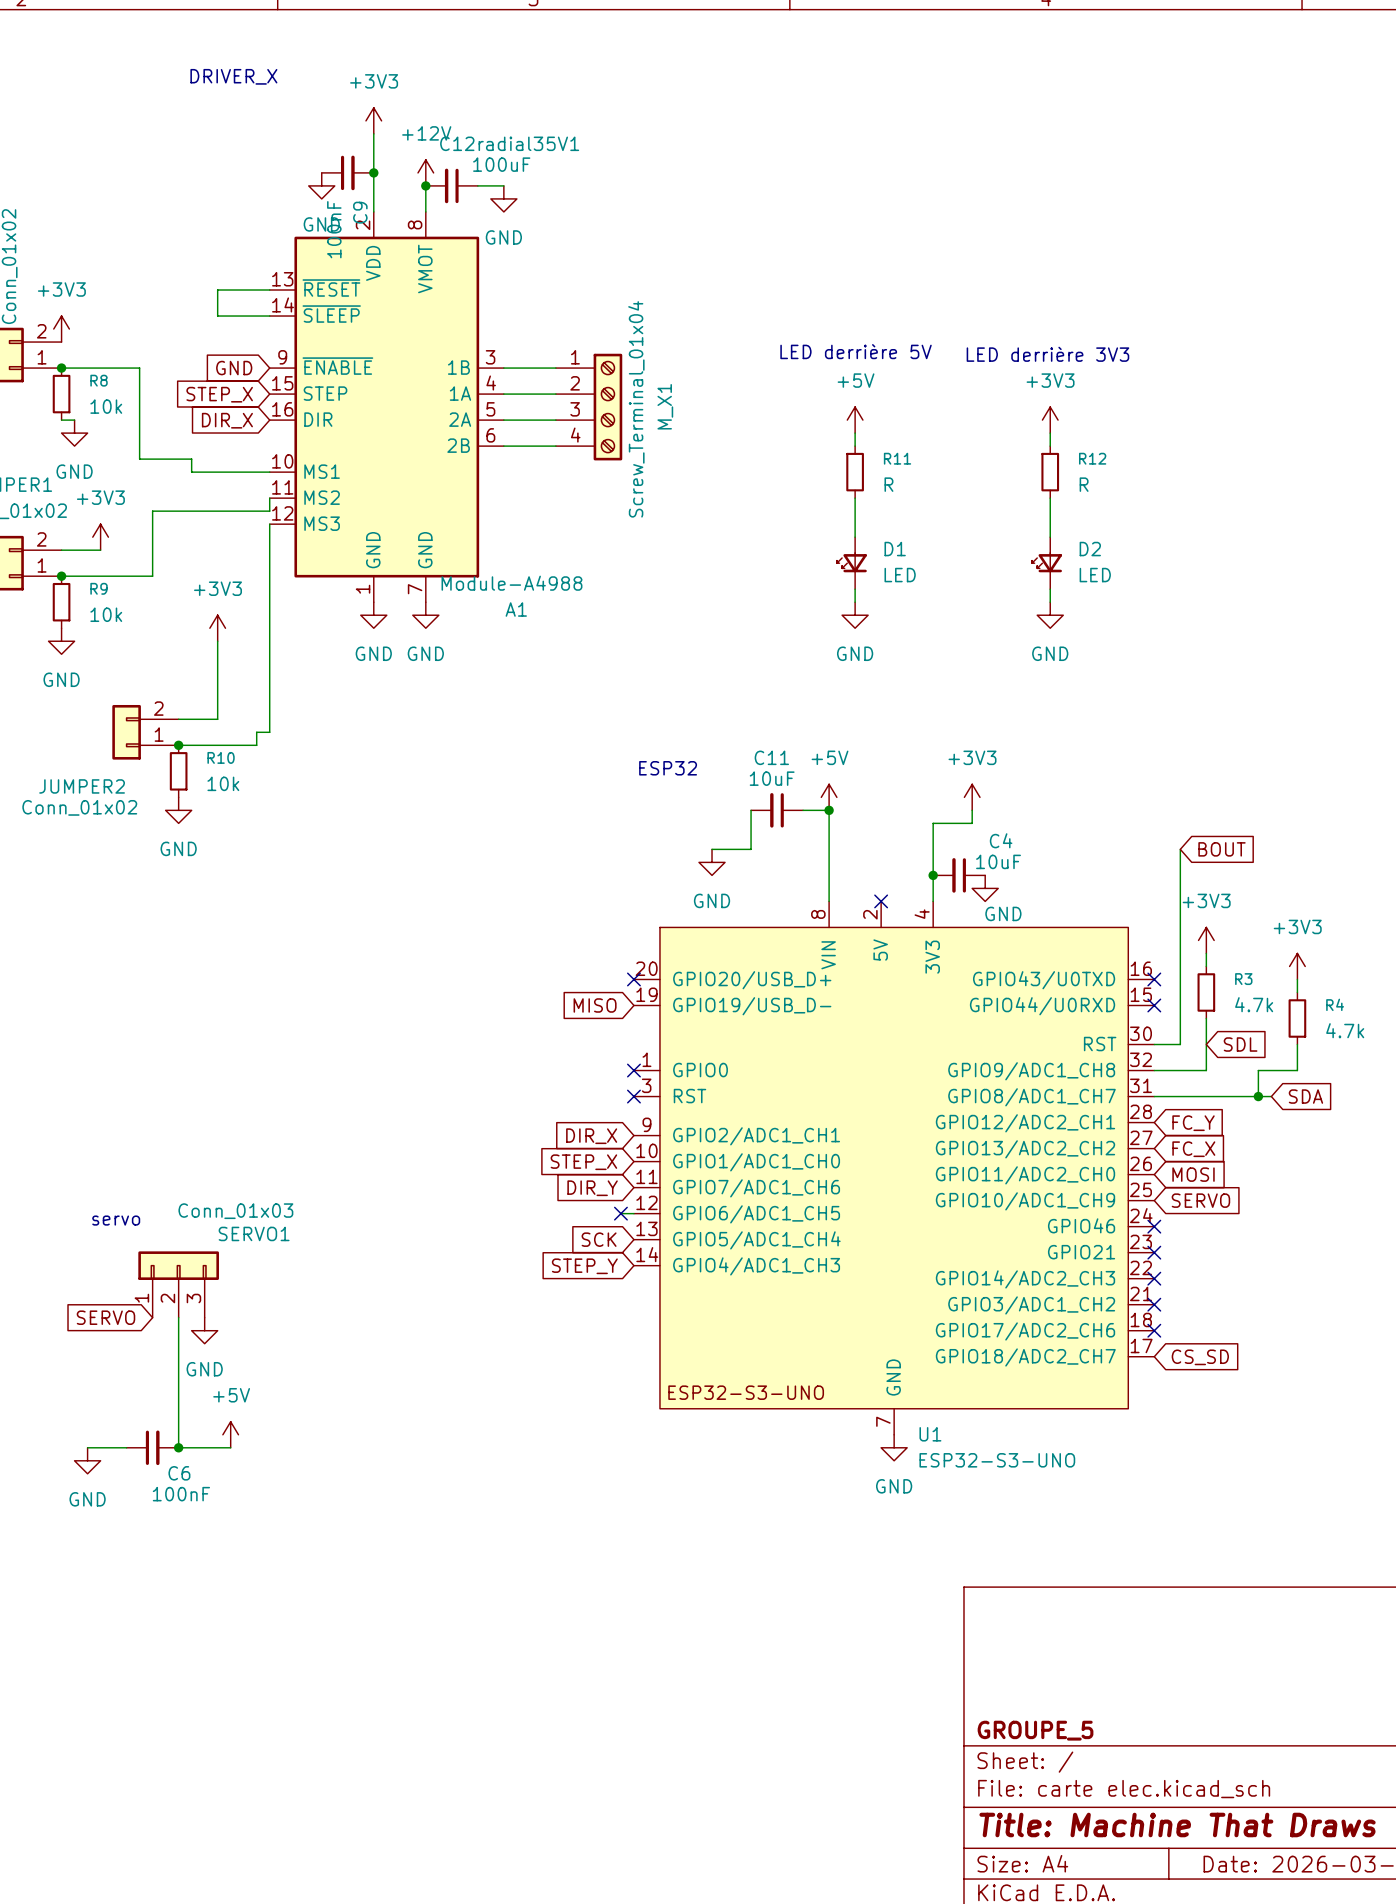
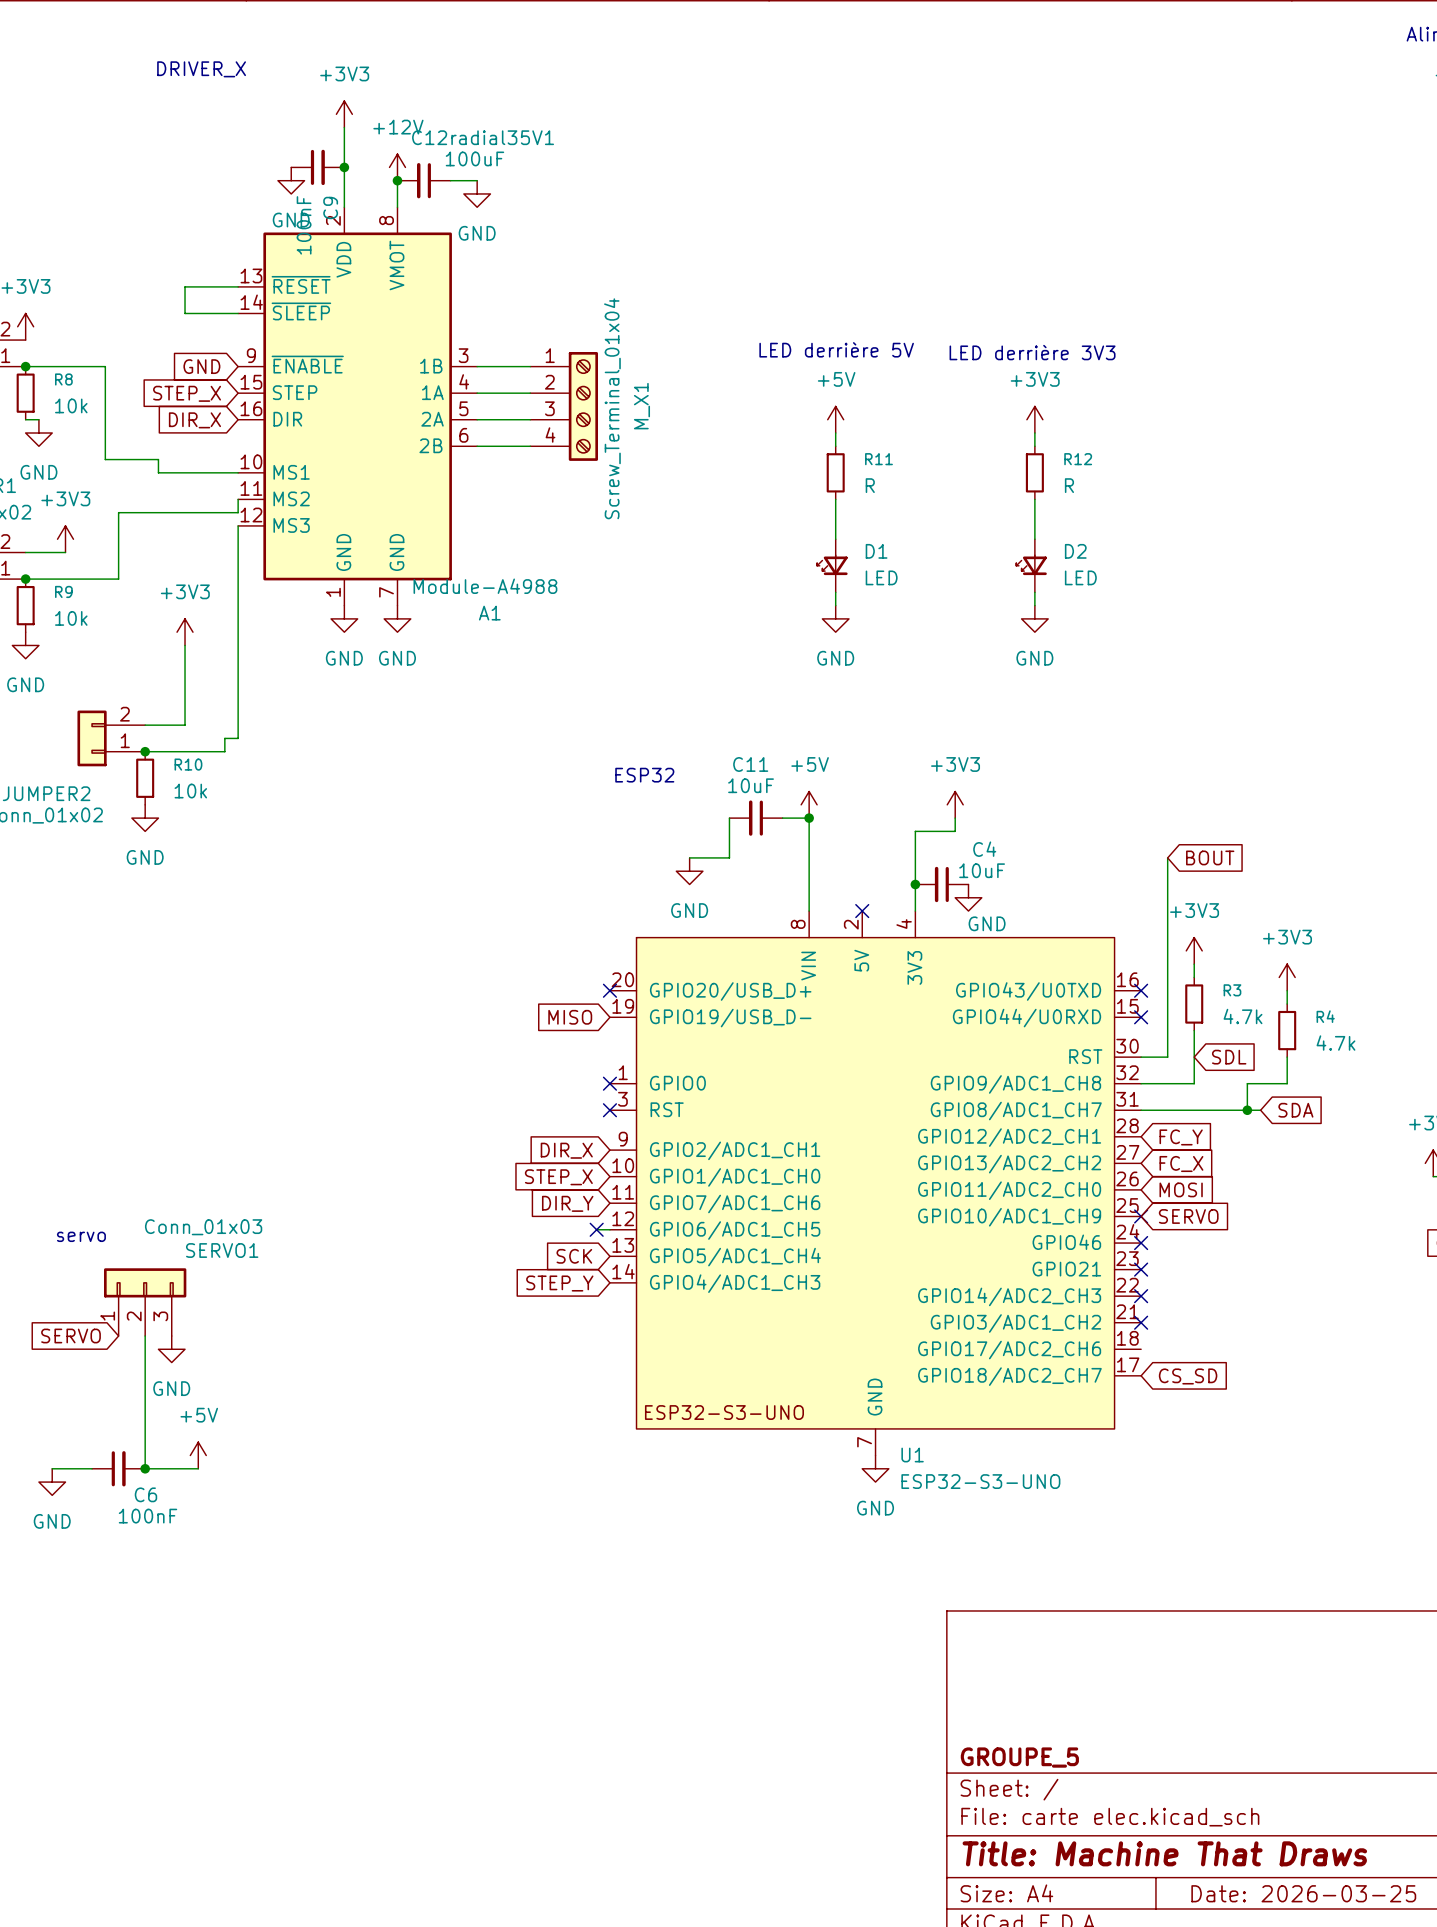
no-connect mark: none -> (1141, 1216)
no-connect mark: (1154, 1330) -> none

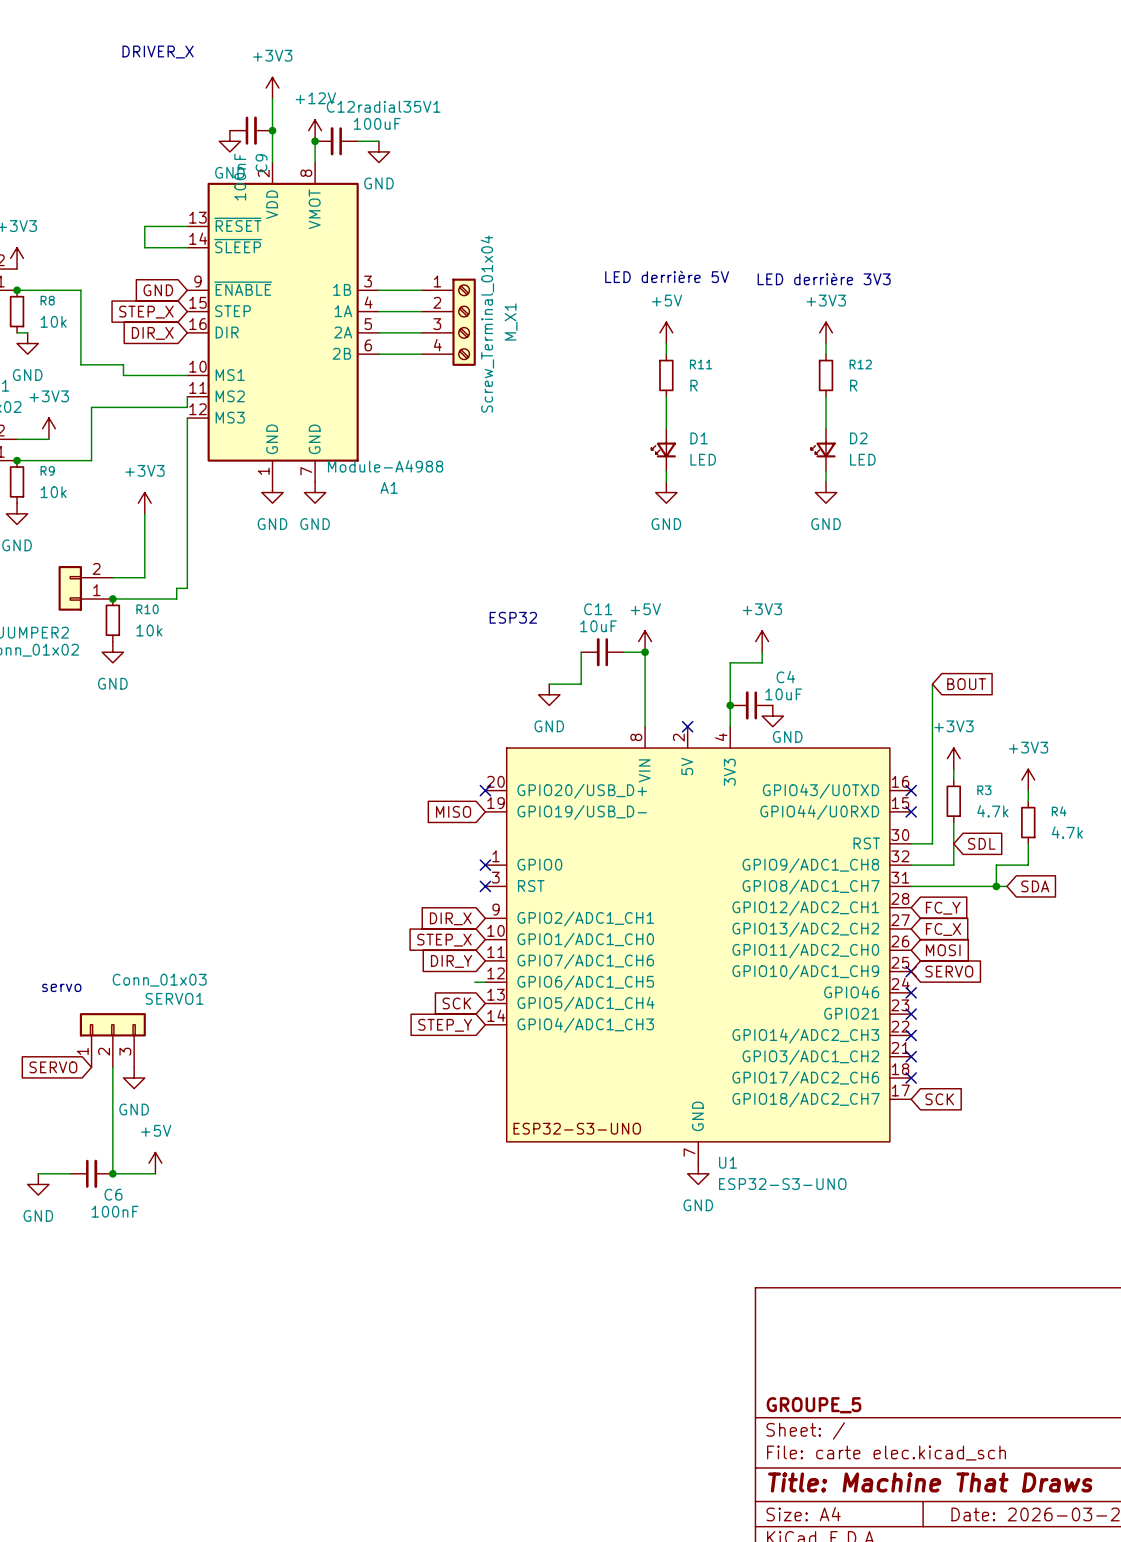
no-connect mark: (596, 1229) -> none
no-connect mark: none -> (911, 1078)
global label: CS_SD (1188, 1376) -> SCK (939, 1099)

